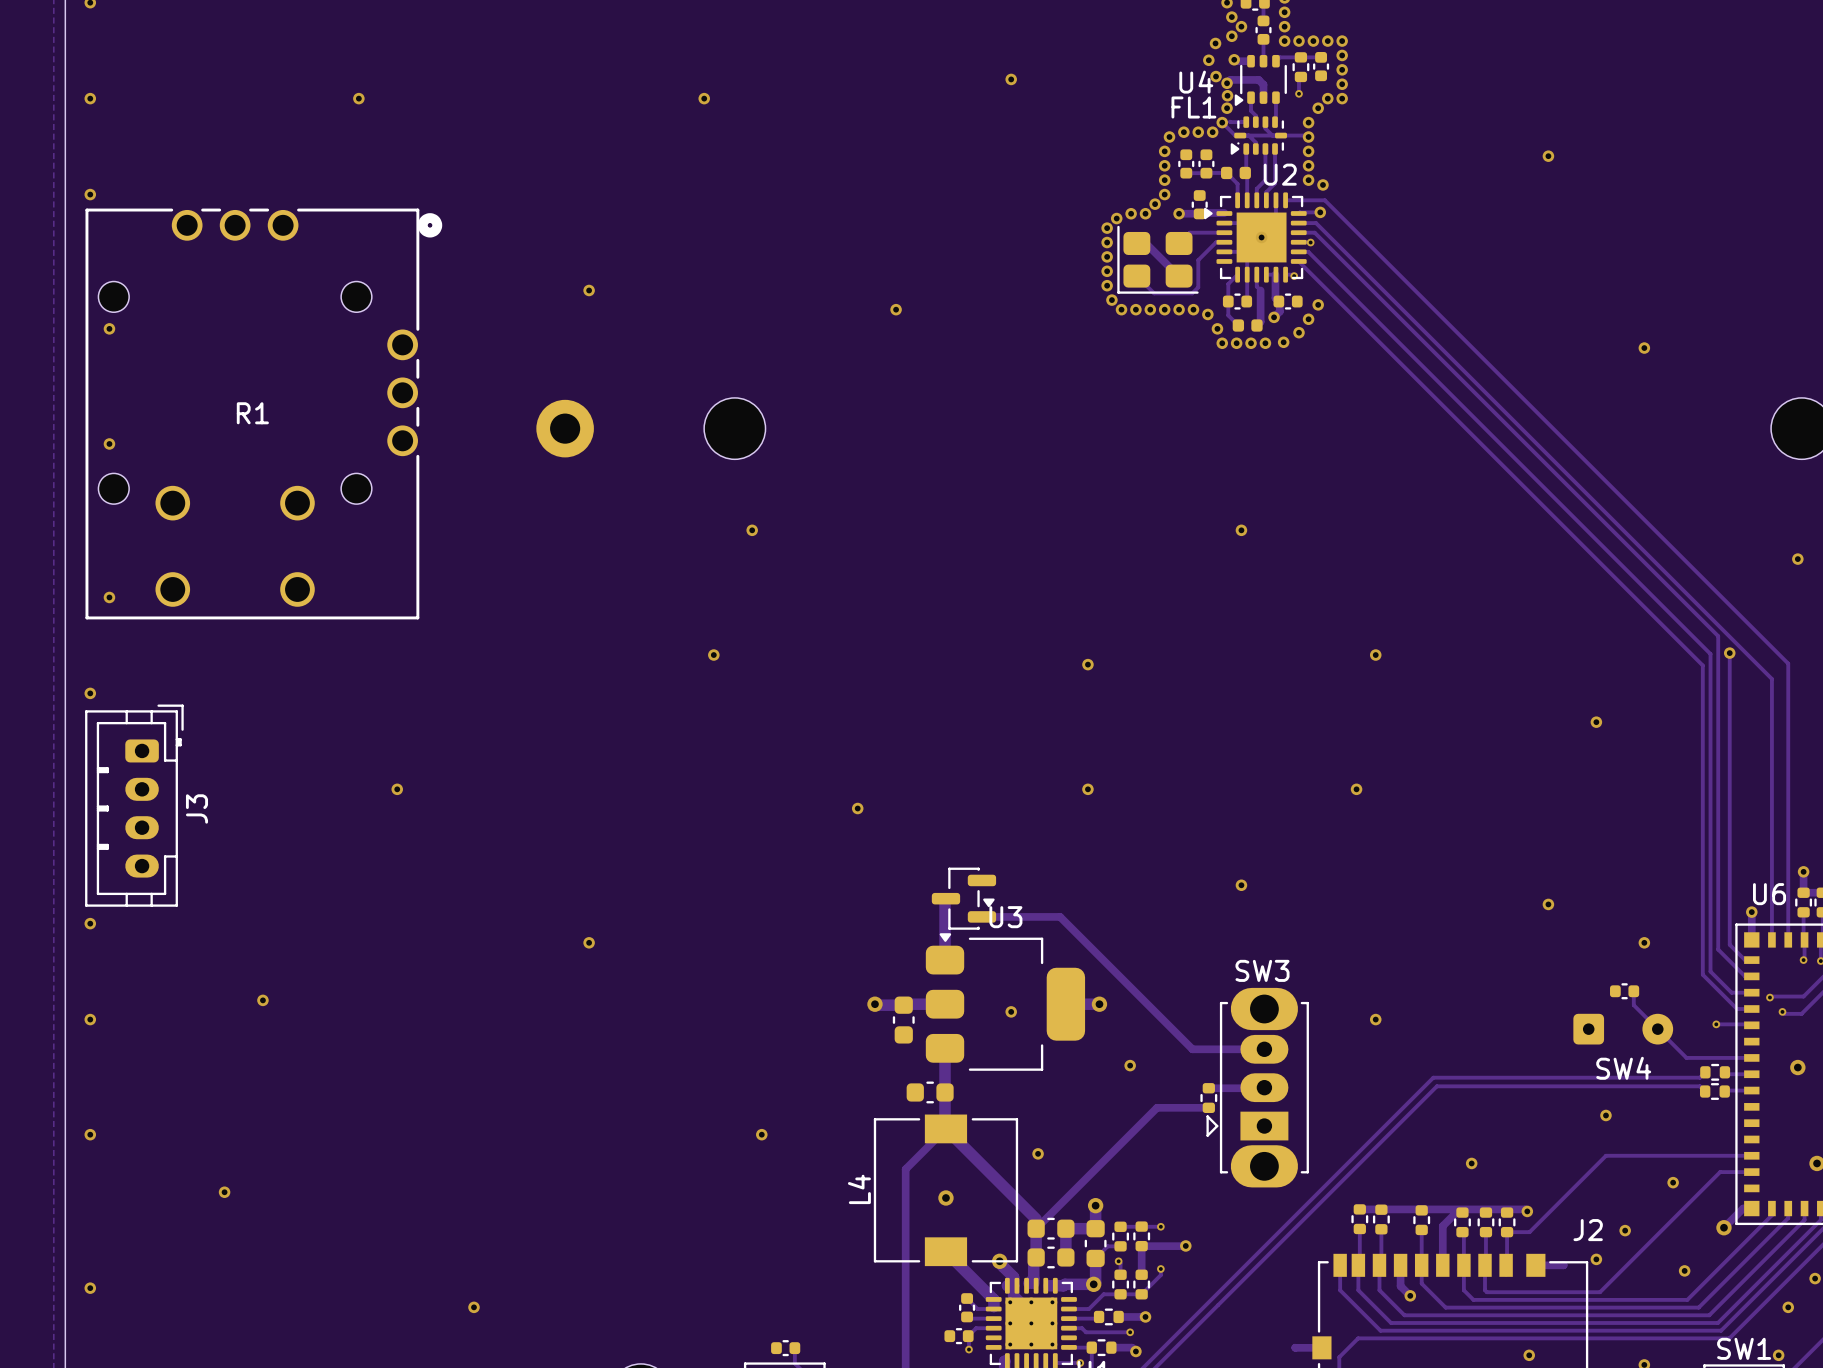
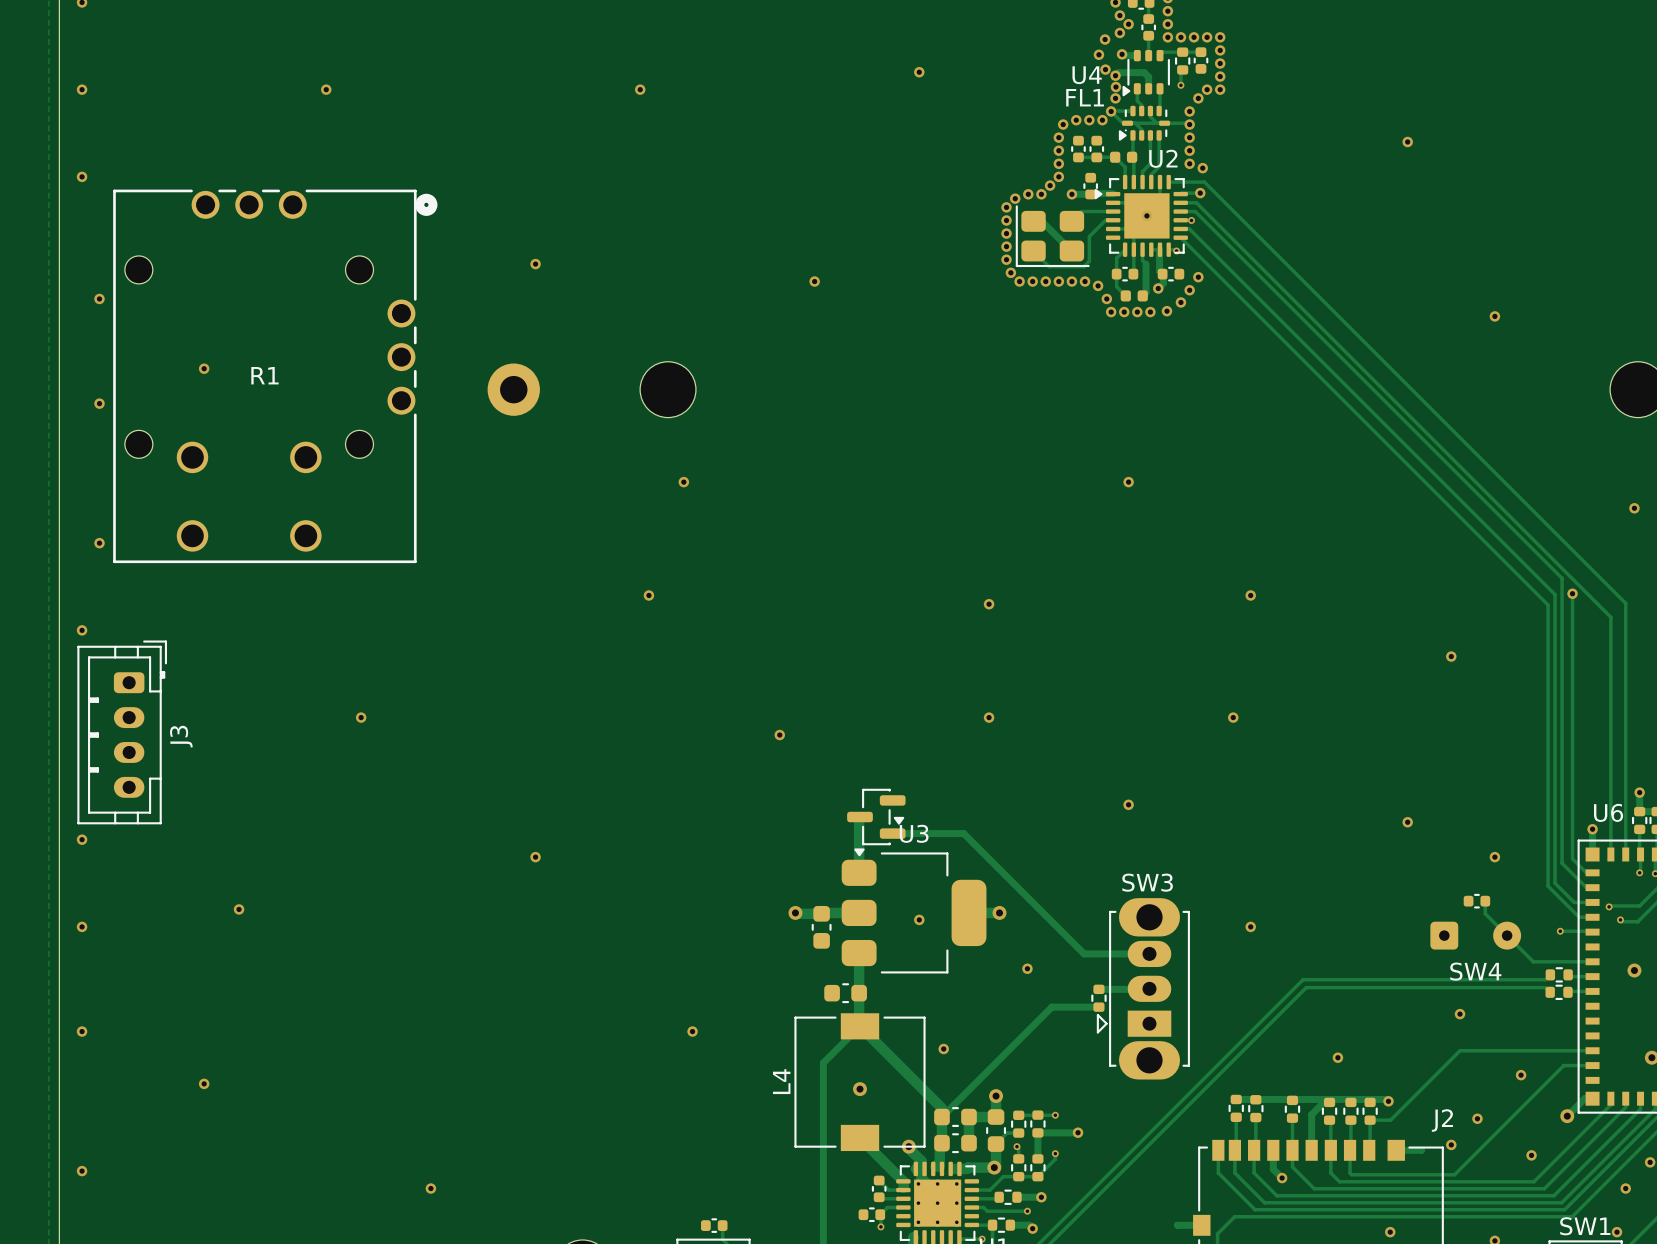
via: none -> (204, 368)
R1 position: (263, 413) -> (275, 376)

